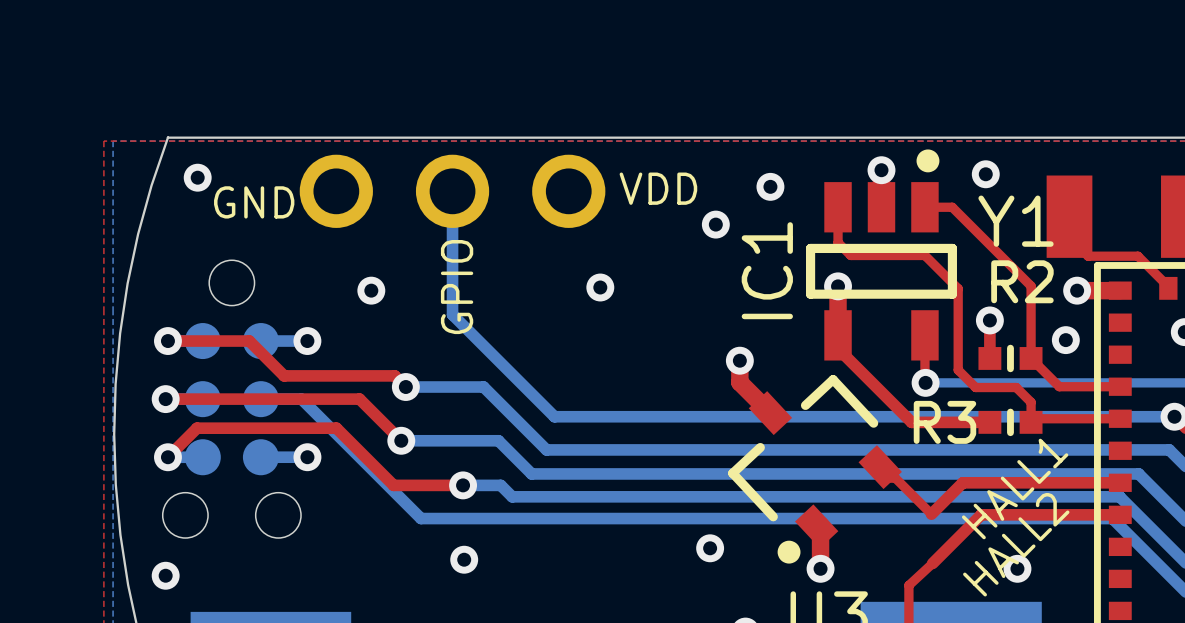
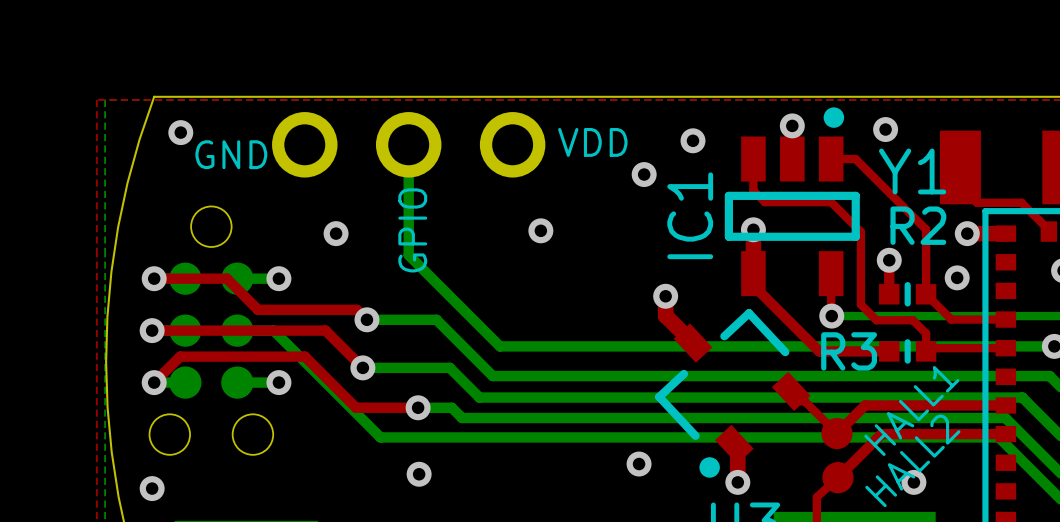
part: none -> (837, 433)
part: none -> (838, 477)

